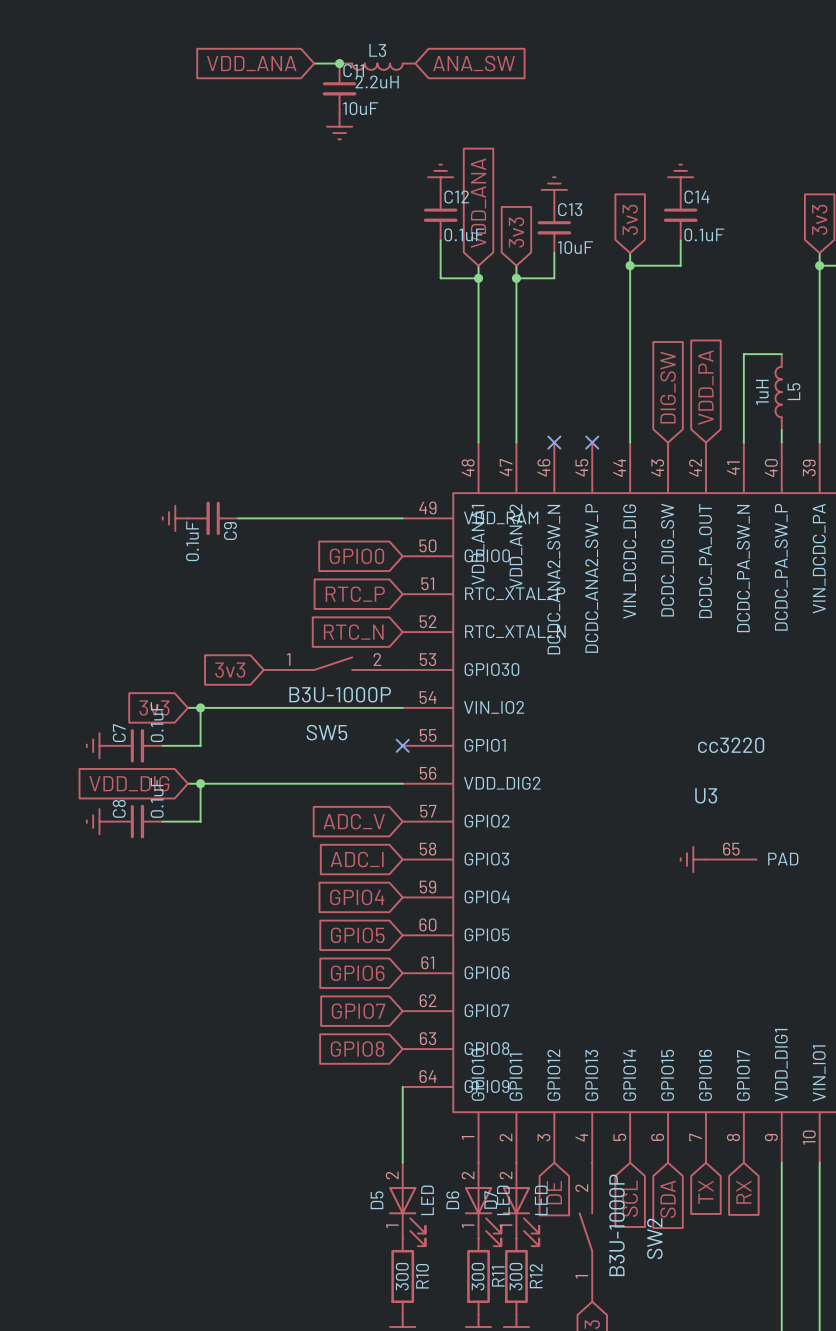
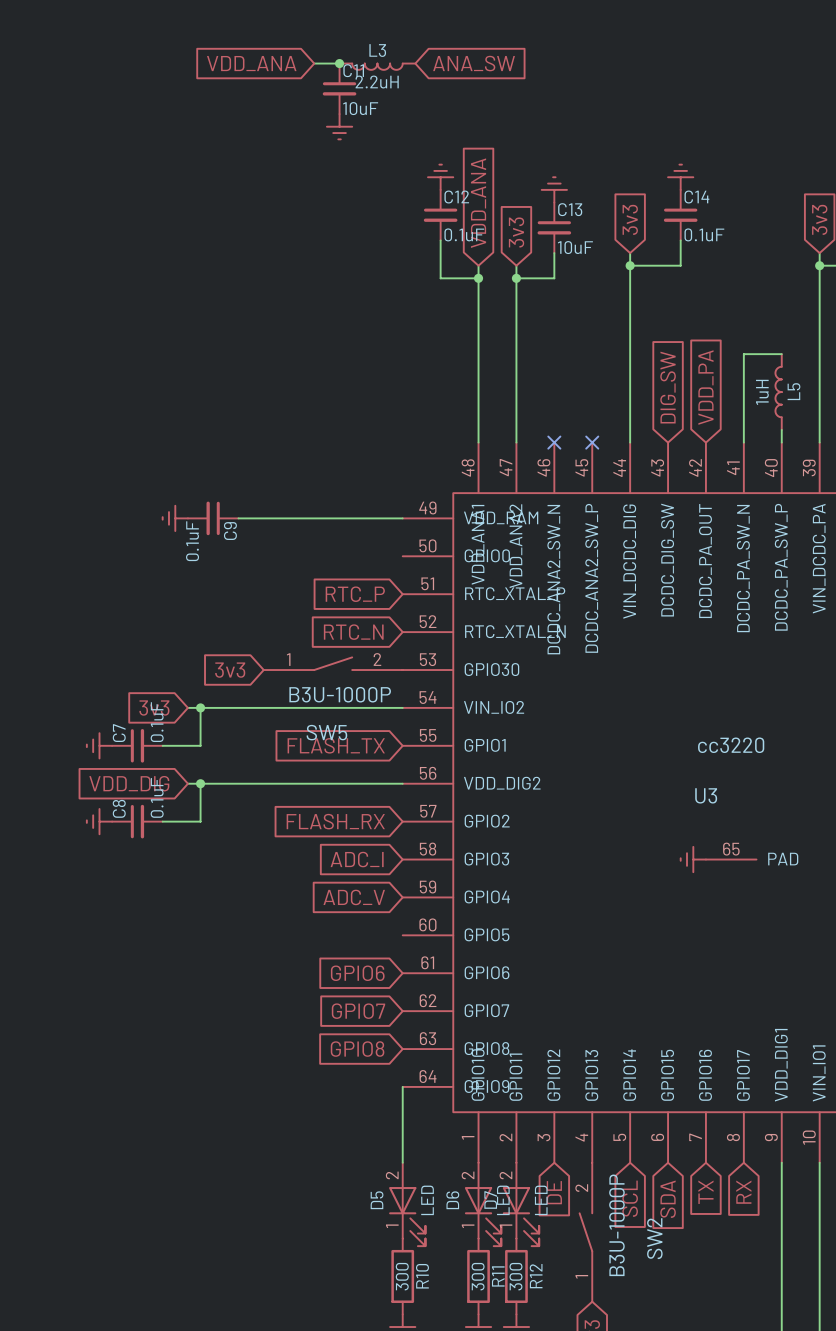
global label: GPIO0 (356, 556) -> none
global label: none -> FLASH_TX (336, 745)
no-connect mark: (402, 745) -> none
global label: ADC_V (354, 821) -> FLASH_RX (335, 821)
global label: GPIO4 (357, 897) -> ADC_V (354, 897)
global label: GPIO5 (357, 935) -> none

